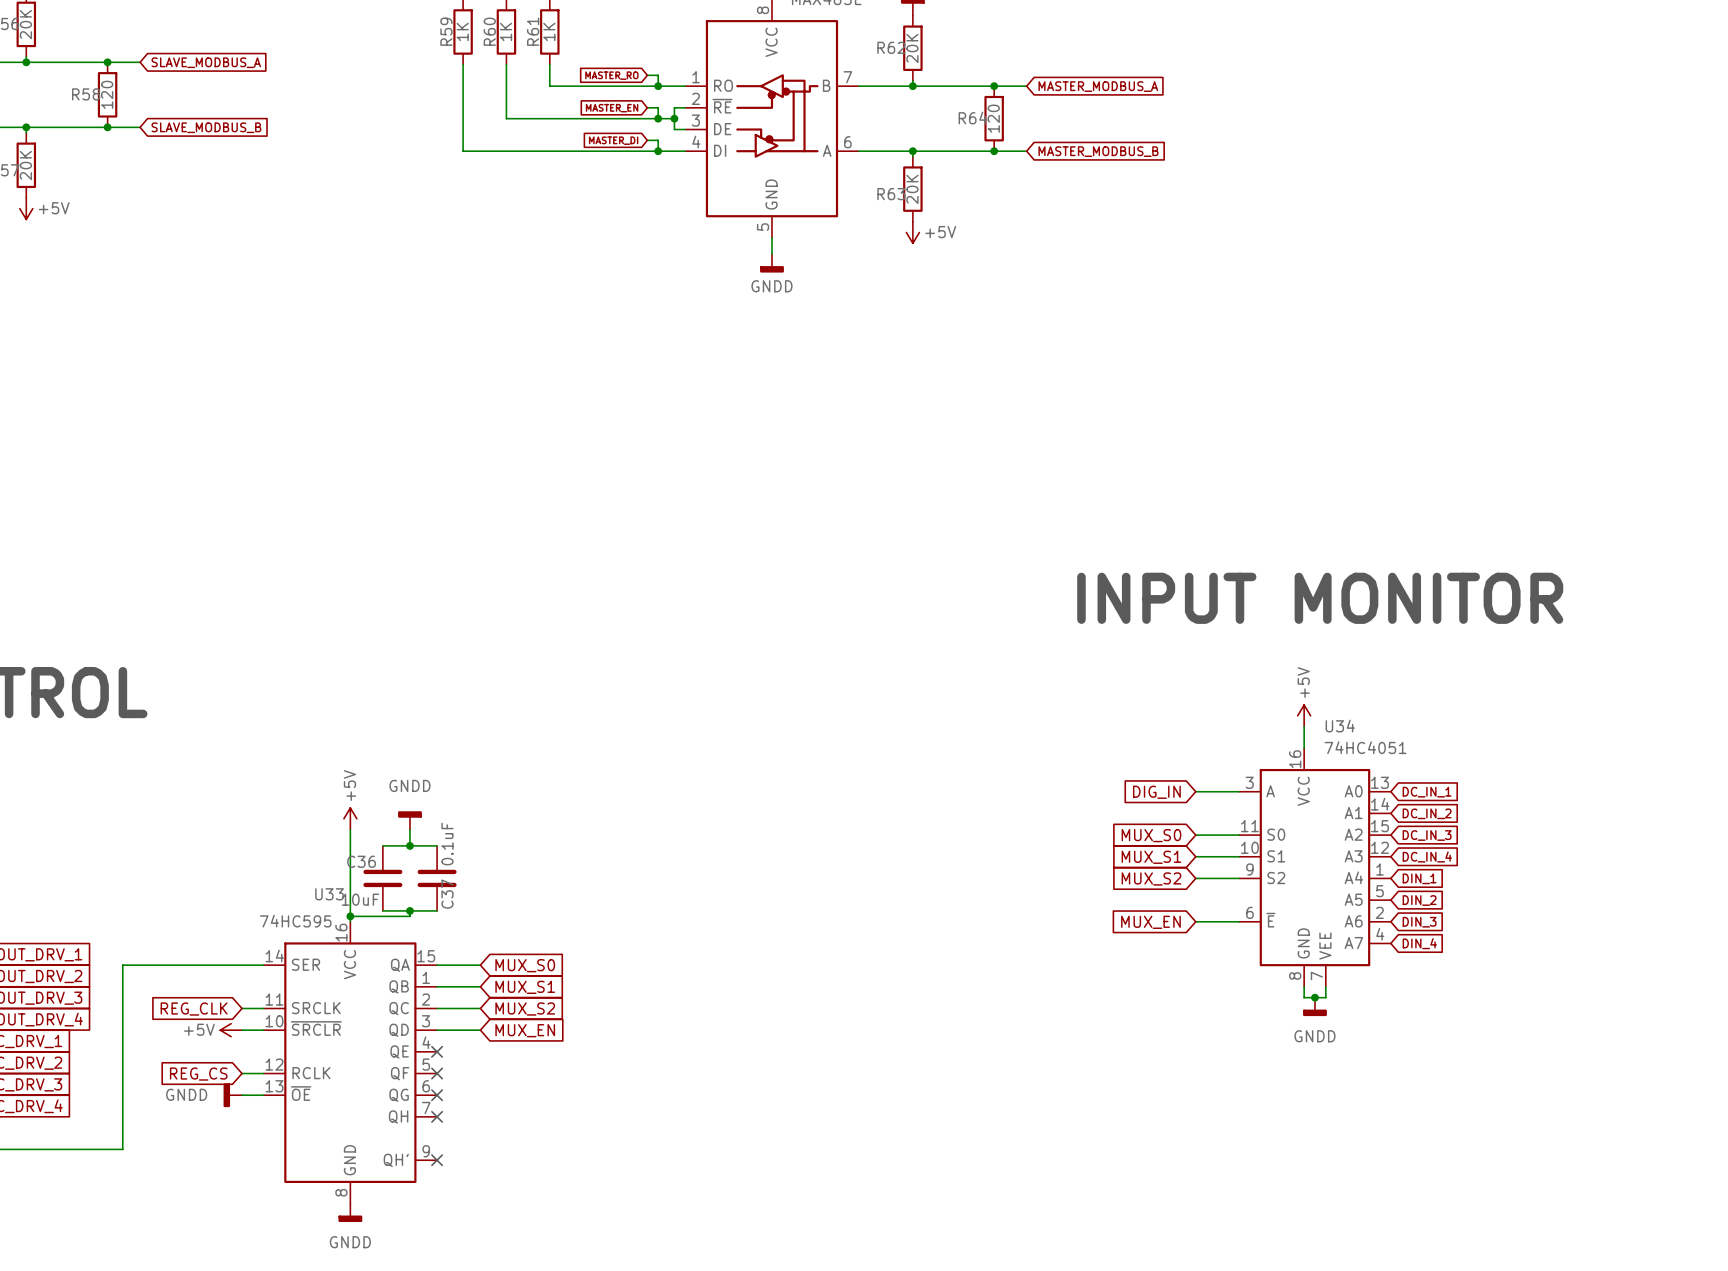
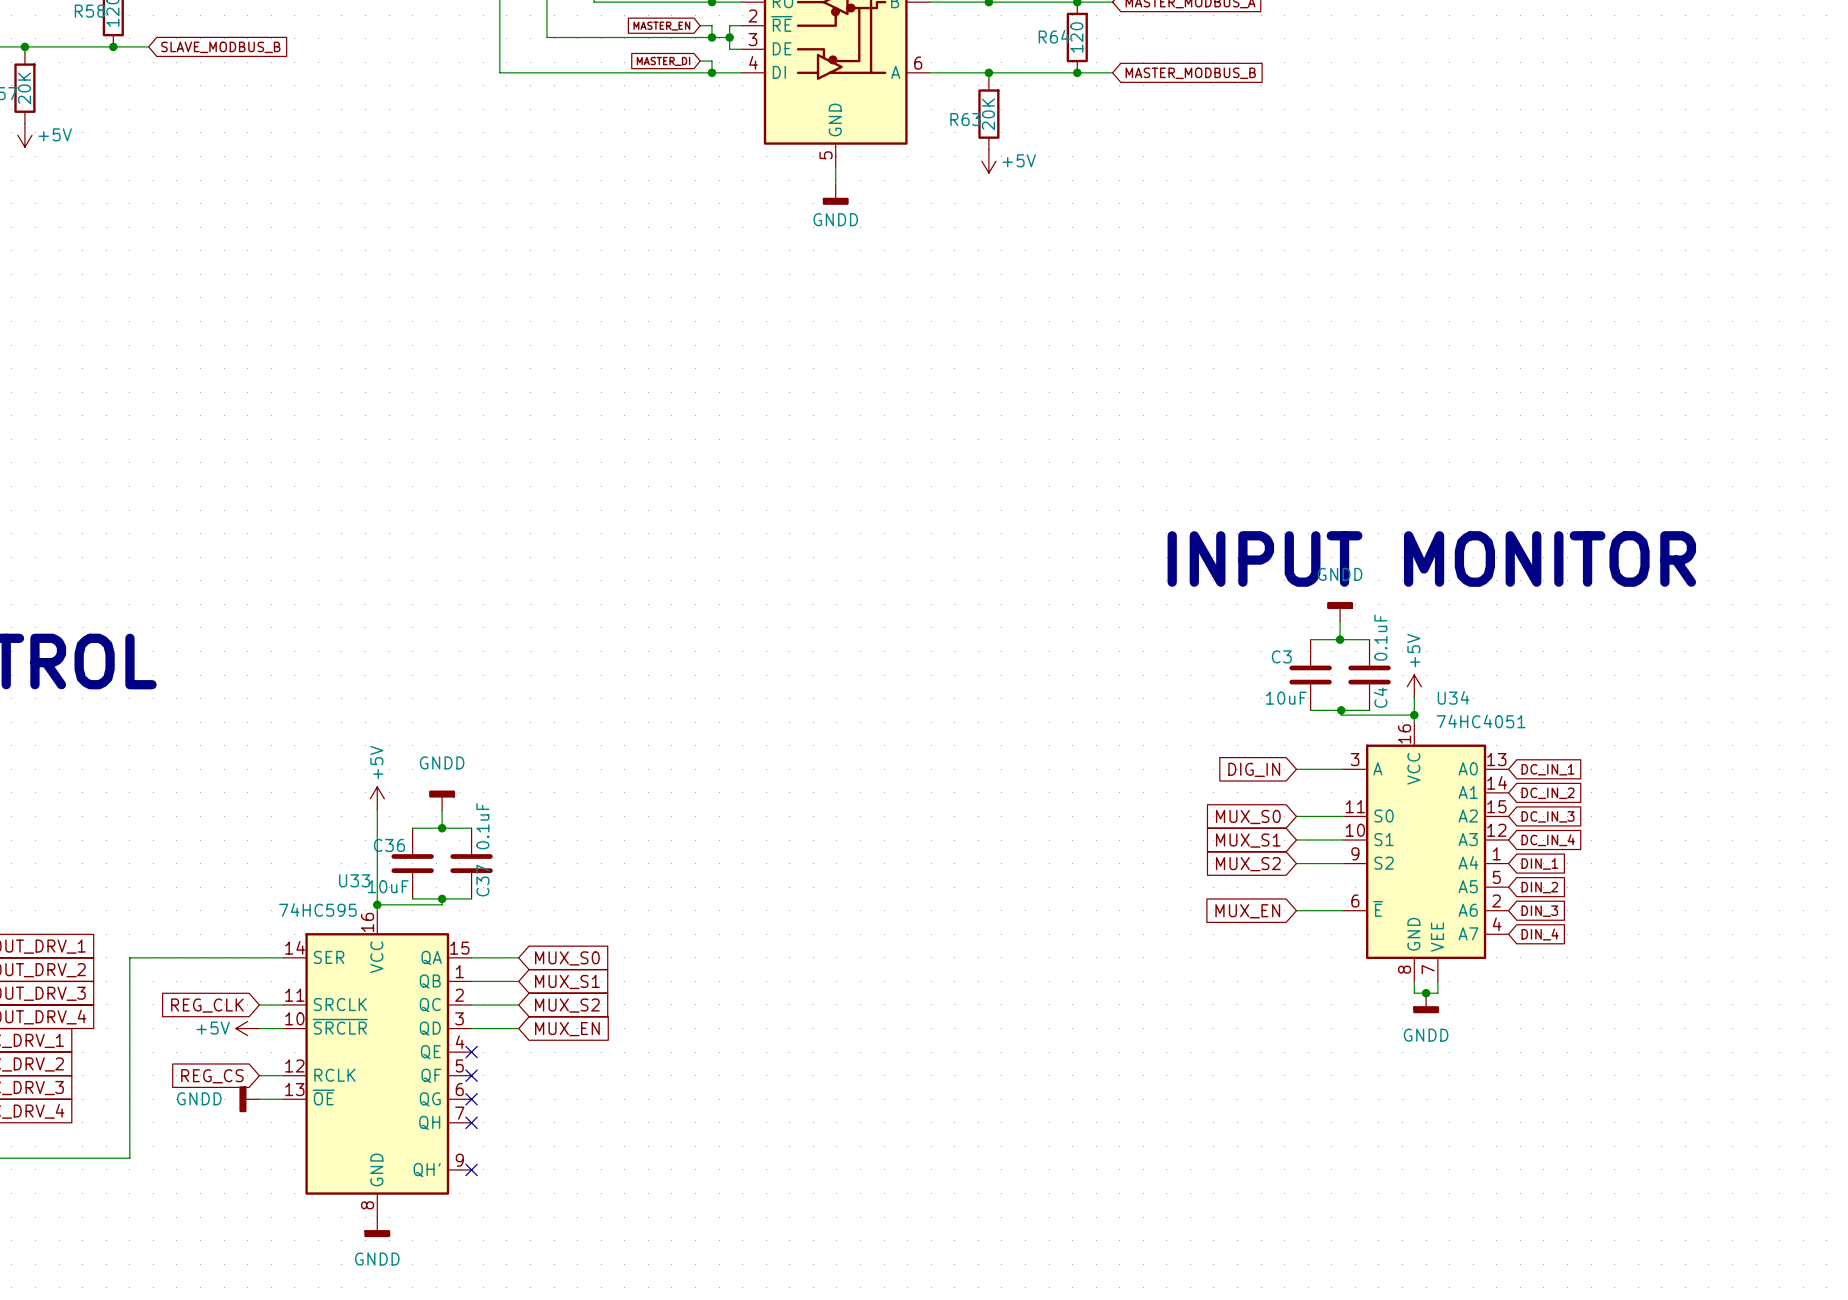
power symbol: none -> GNDD (1340, 611)
wire: none -> (1340, 621) (1340, 639)
wire: none -> (1310, 639) (1369, 639)
junction: none -> (1340, 639)
C3: none -> 10uF (1310, 675)
C4: none -> 0.1uF (1369, 675)
wire: none -> (1310, 710) (1369, 710)
wire: none -> (1341, 710) (1341, 715) (1414, 715)
junction: none -> (1341, 710)
junction: none -> (1414, 715)

